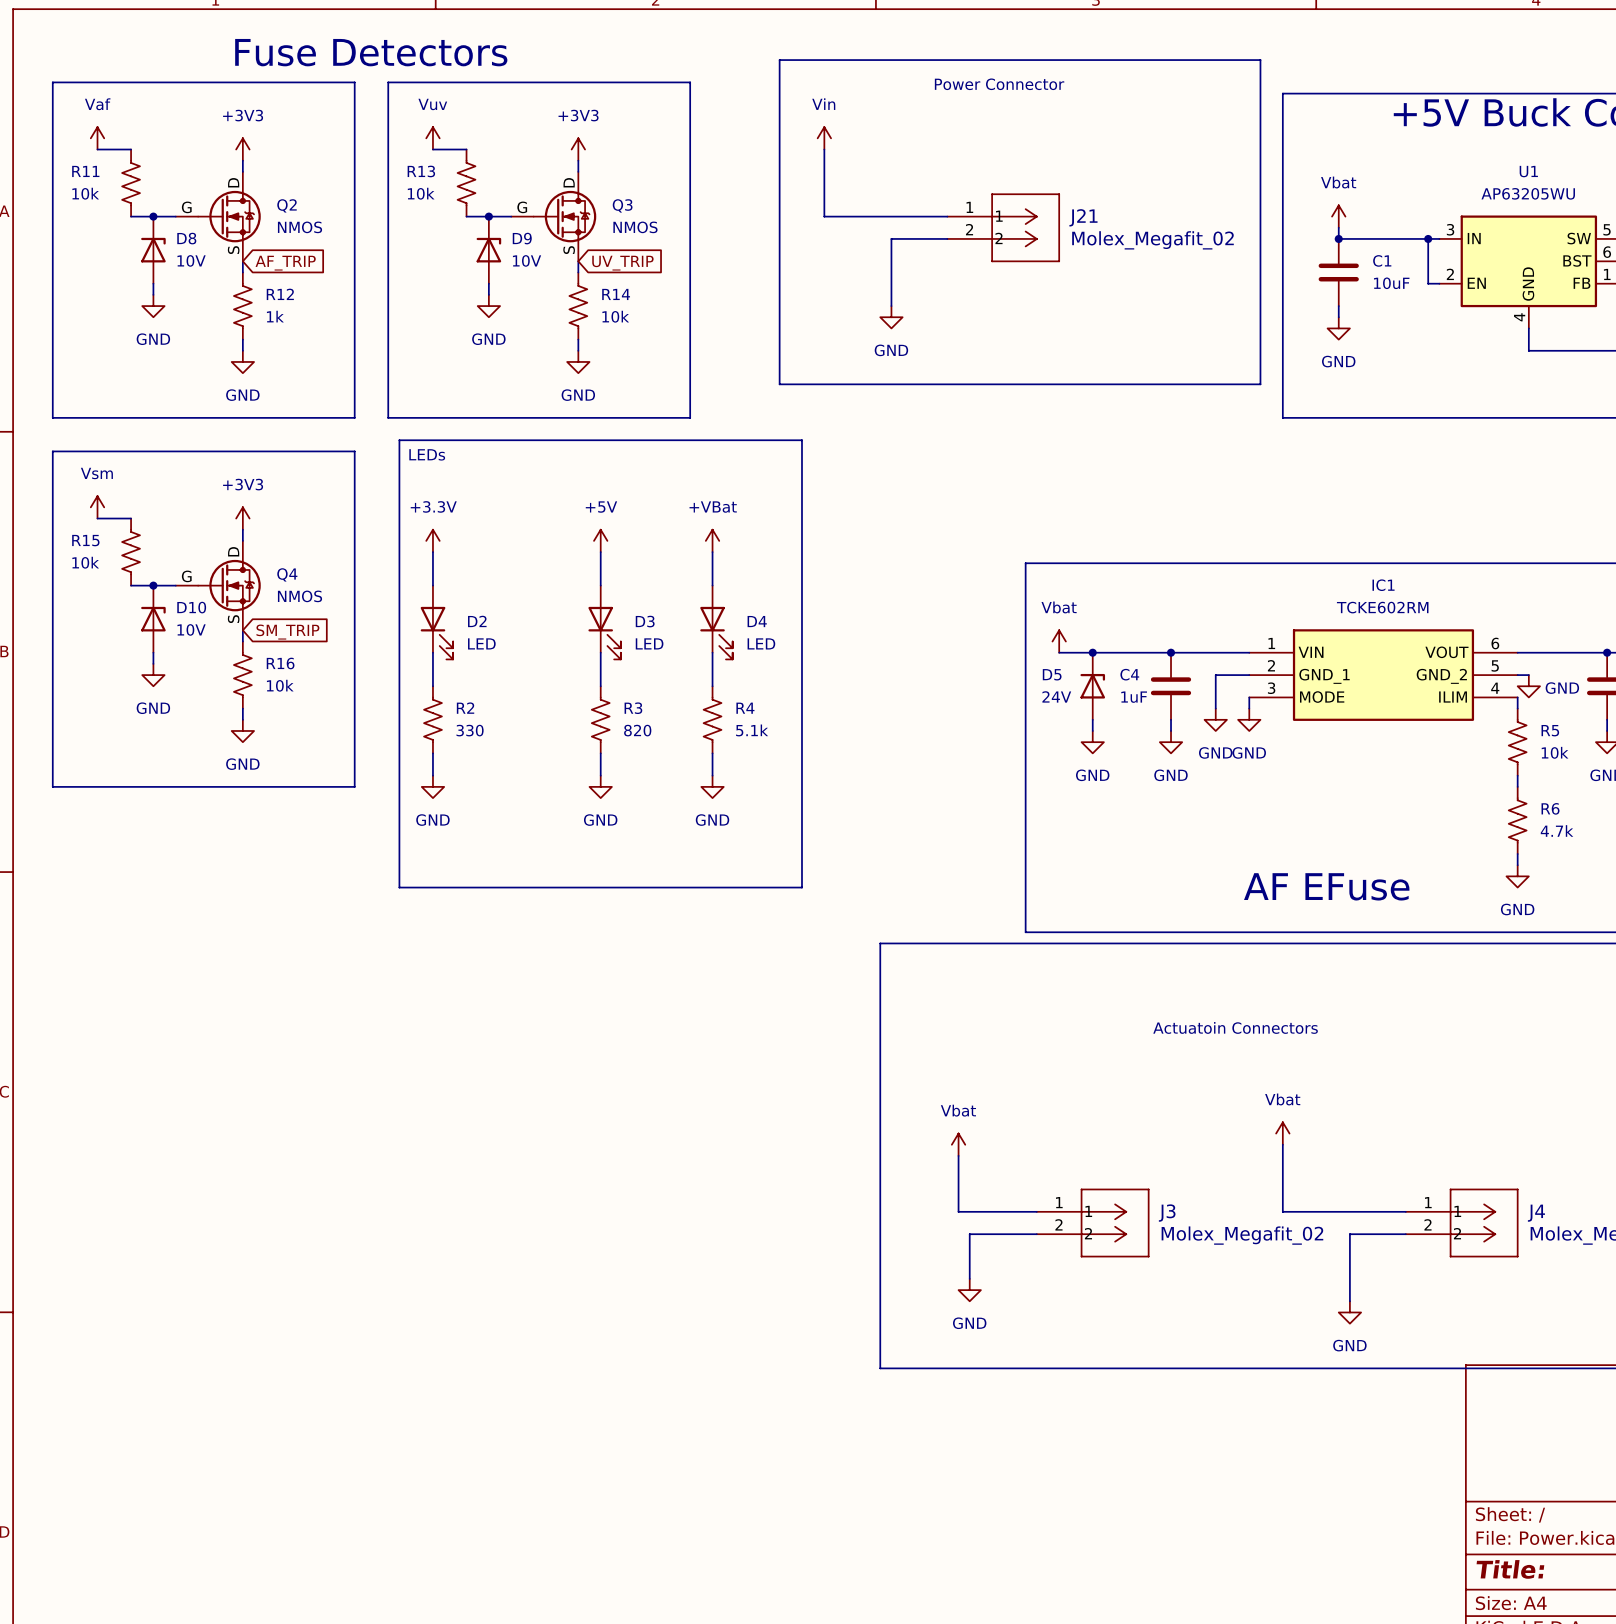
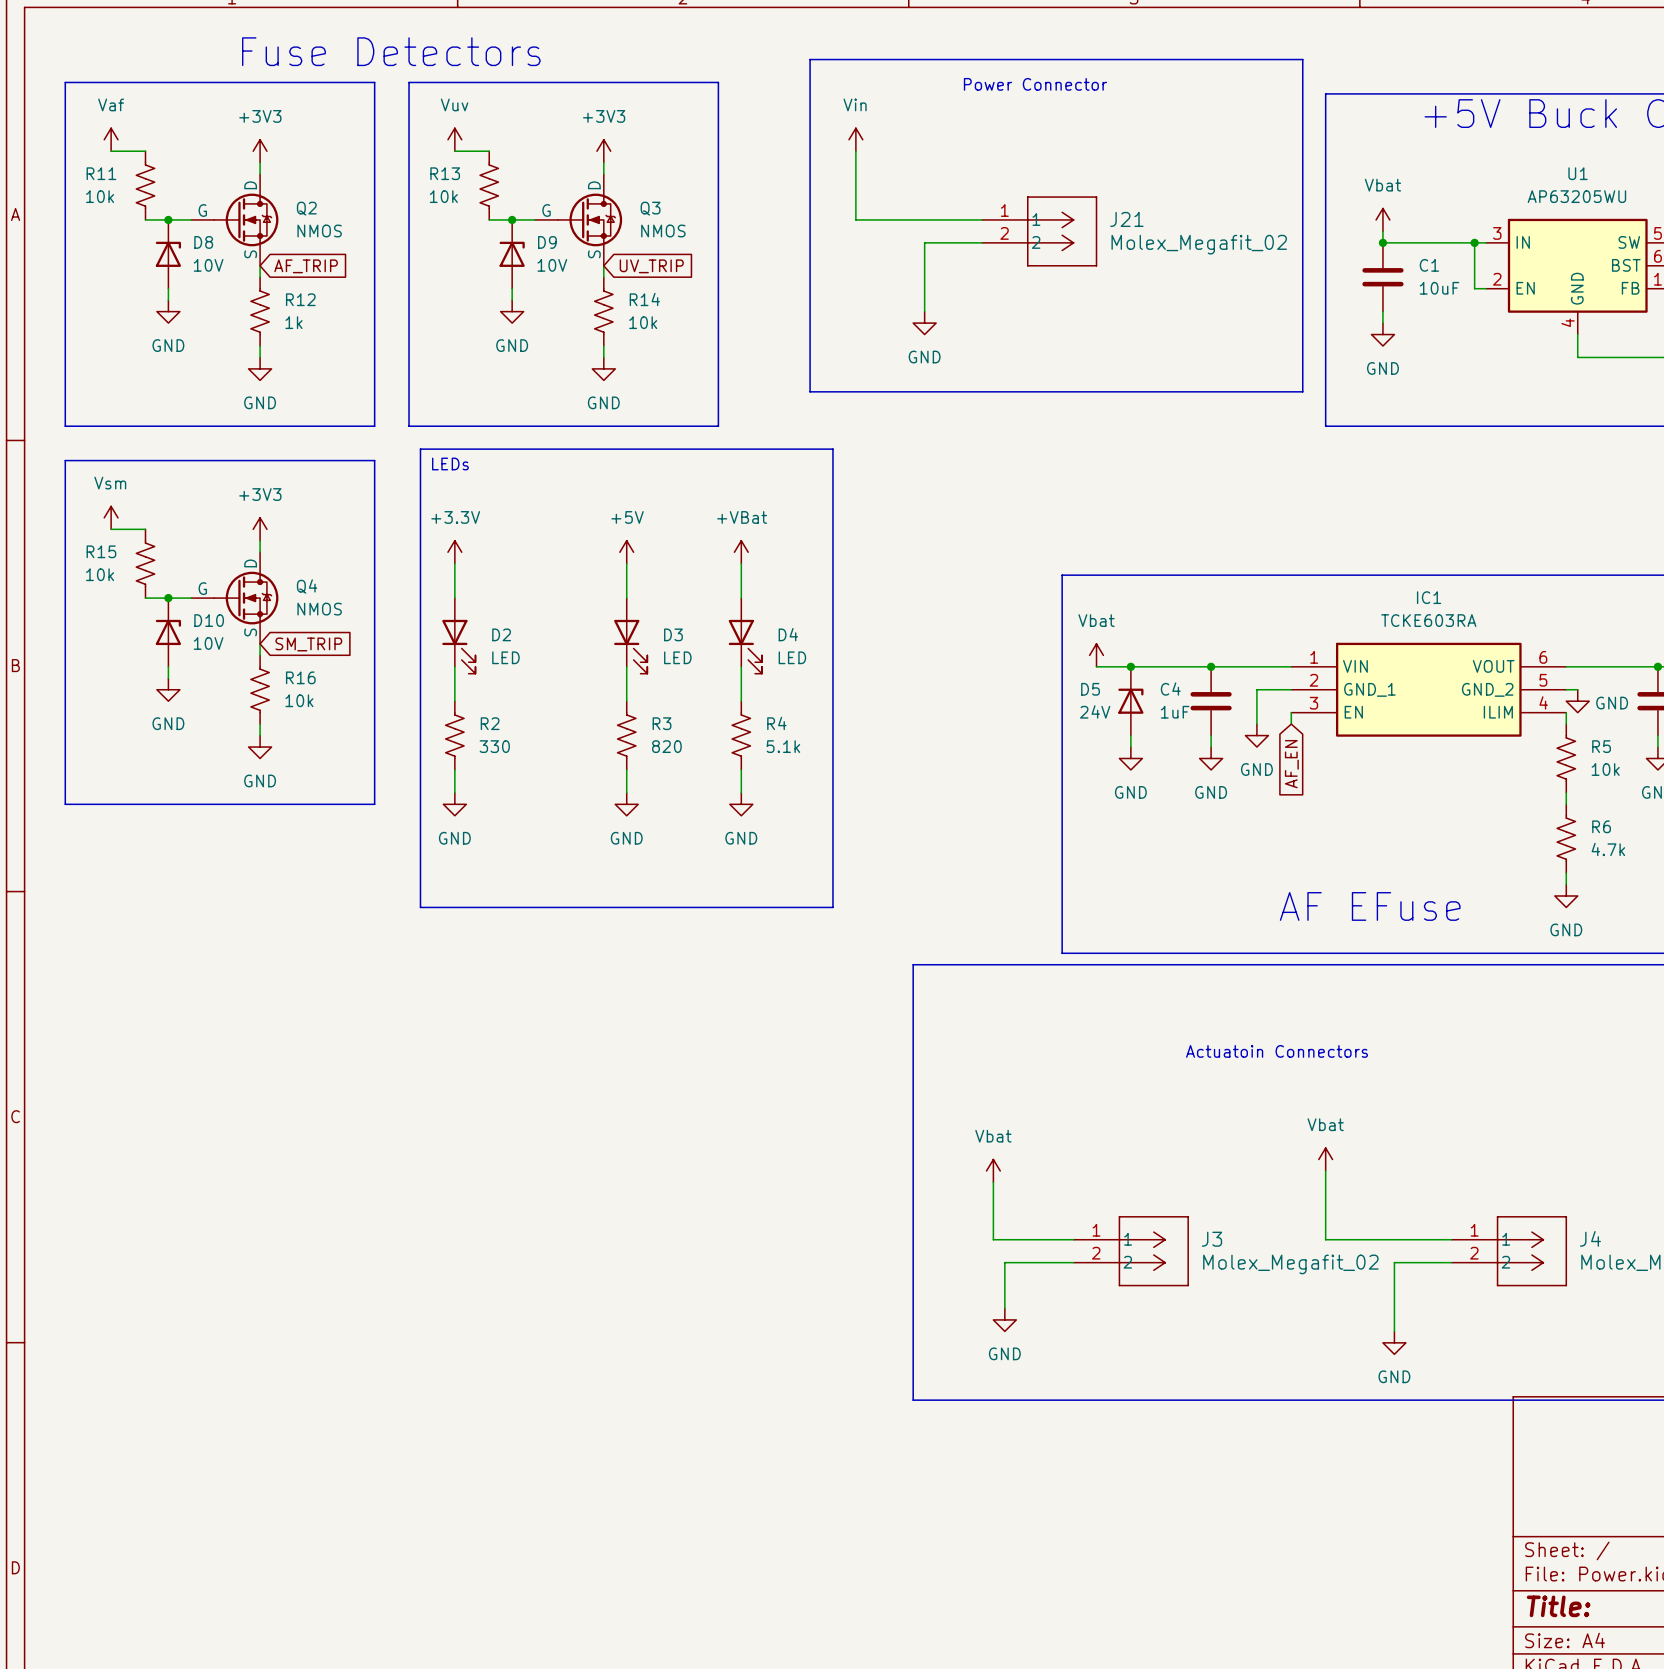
IC1 value: TCKE602RM (1382, 607) -> TCKE603RA (1428, 620)
IC1 pin name: MODE (1322, 697) -> EN (1353, 712)
power symbol: GND (1249, 719) -> none
global label: none -> AF_EN (1291, 764)

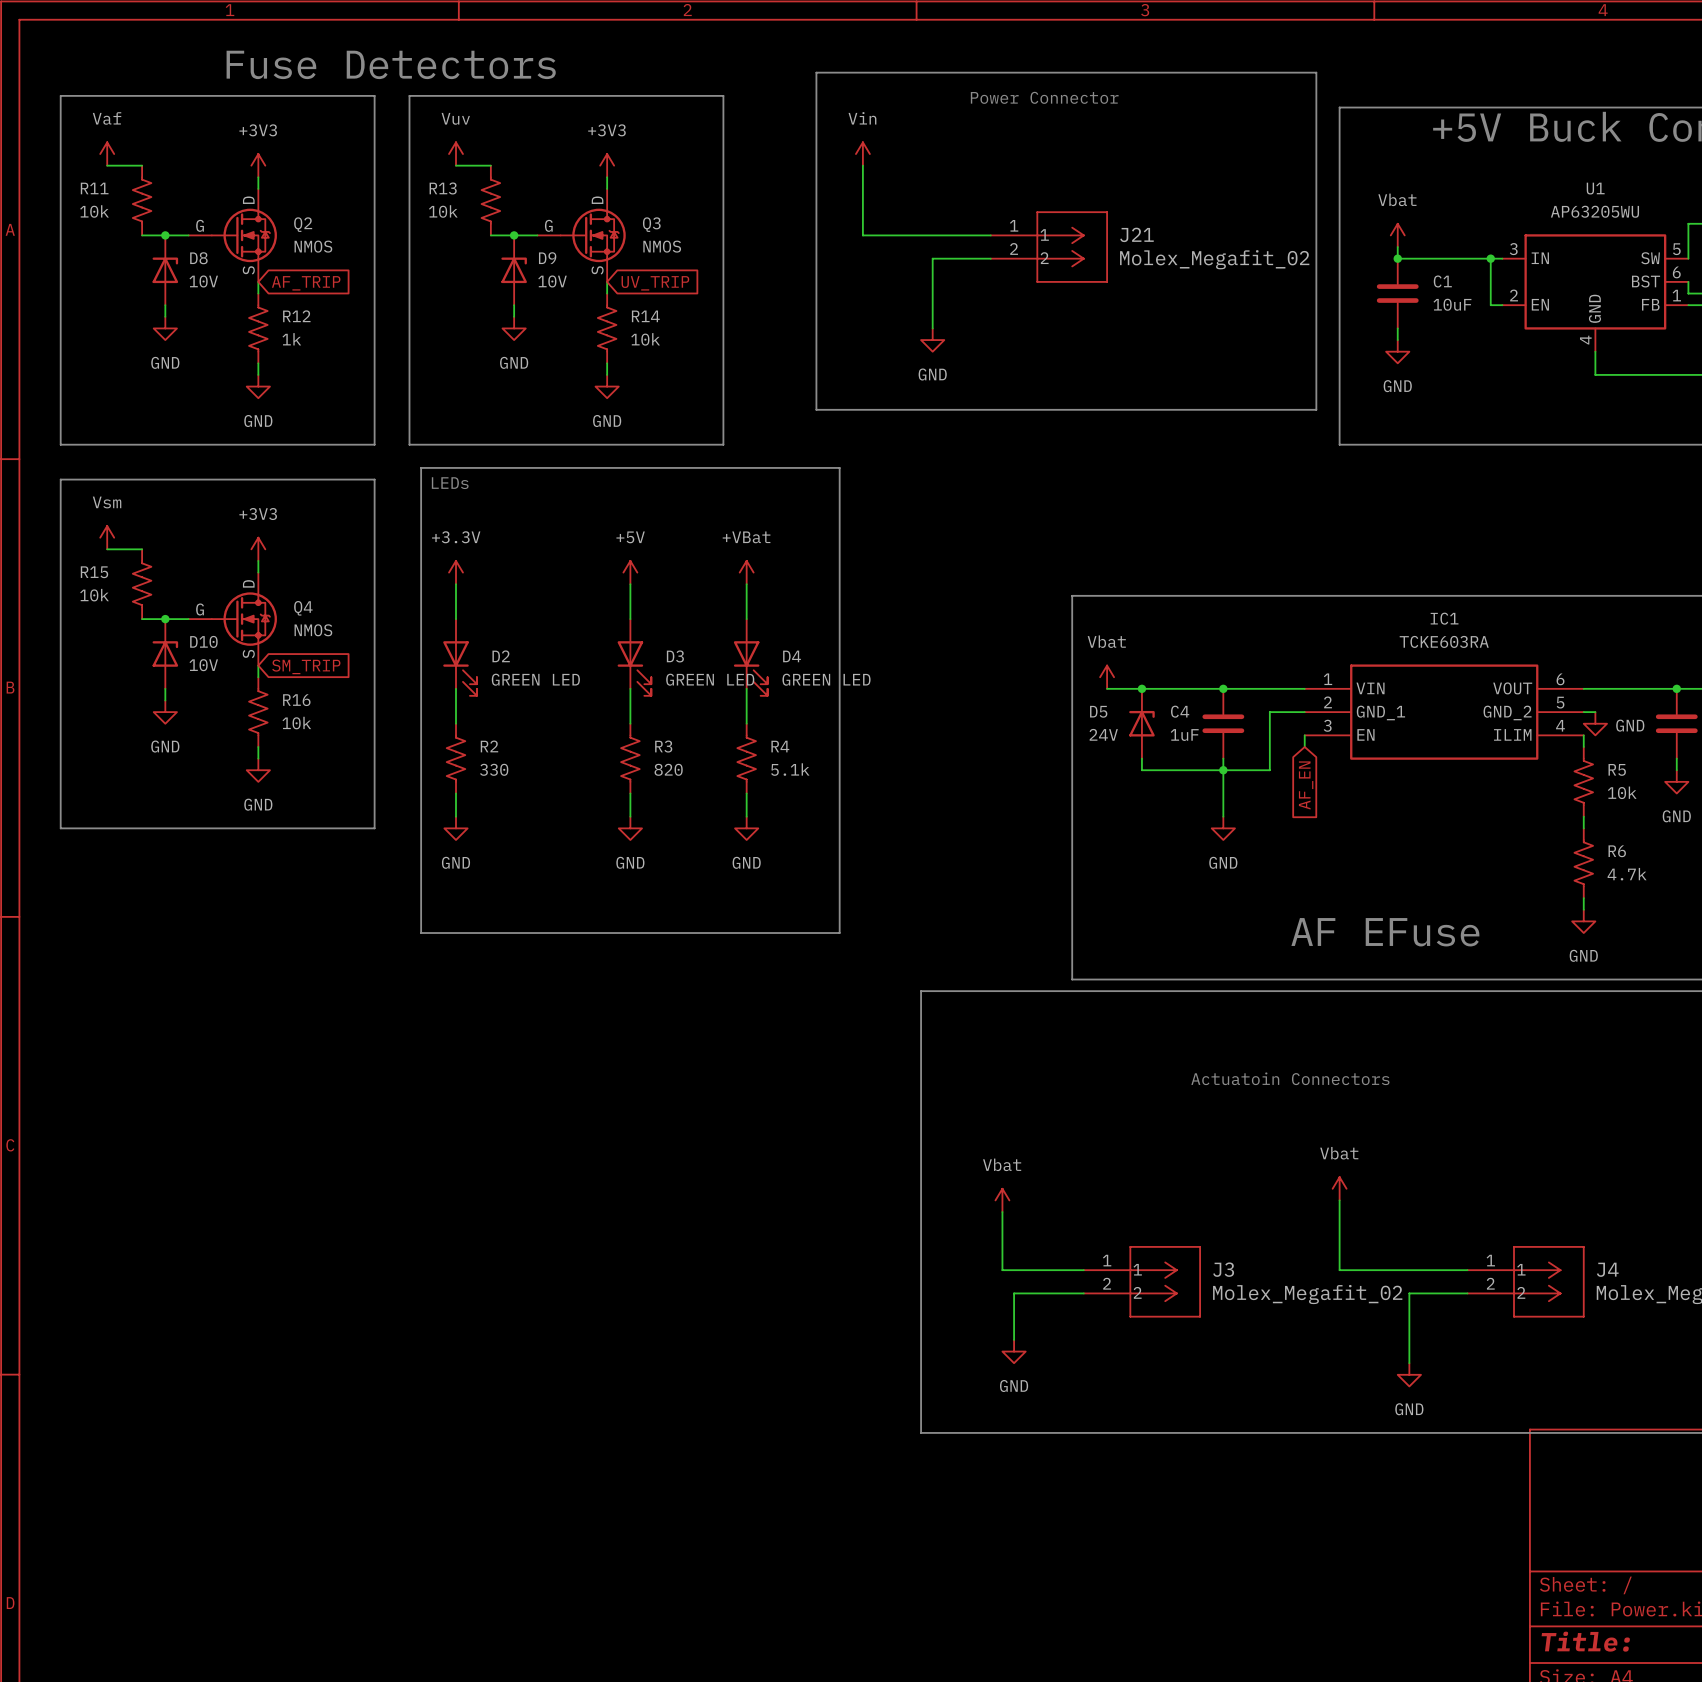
D2 value: LED (505, 657) -> GREEN LED (535, 679)
D3 value: LED (677, 657) -> GREEN LED (710, 679)
D4 value: LED (792, 657) -> GREEN LED (826, 679)
wire: none -> (1269, 746) (1269, 770) (1141, 770)
power symbol: GND (1256, 735) -> none
wire: none -> (1223, 770) (1223, 816)
junction: none -> (1223, 770)
power symbol: GND (1130, 758) -> none
power symbol: GND (1211, 758) -> none
power symbol: none -> GND (1223, 828)

